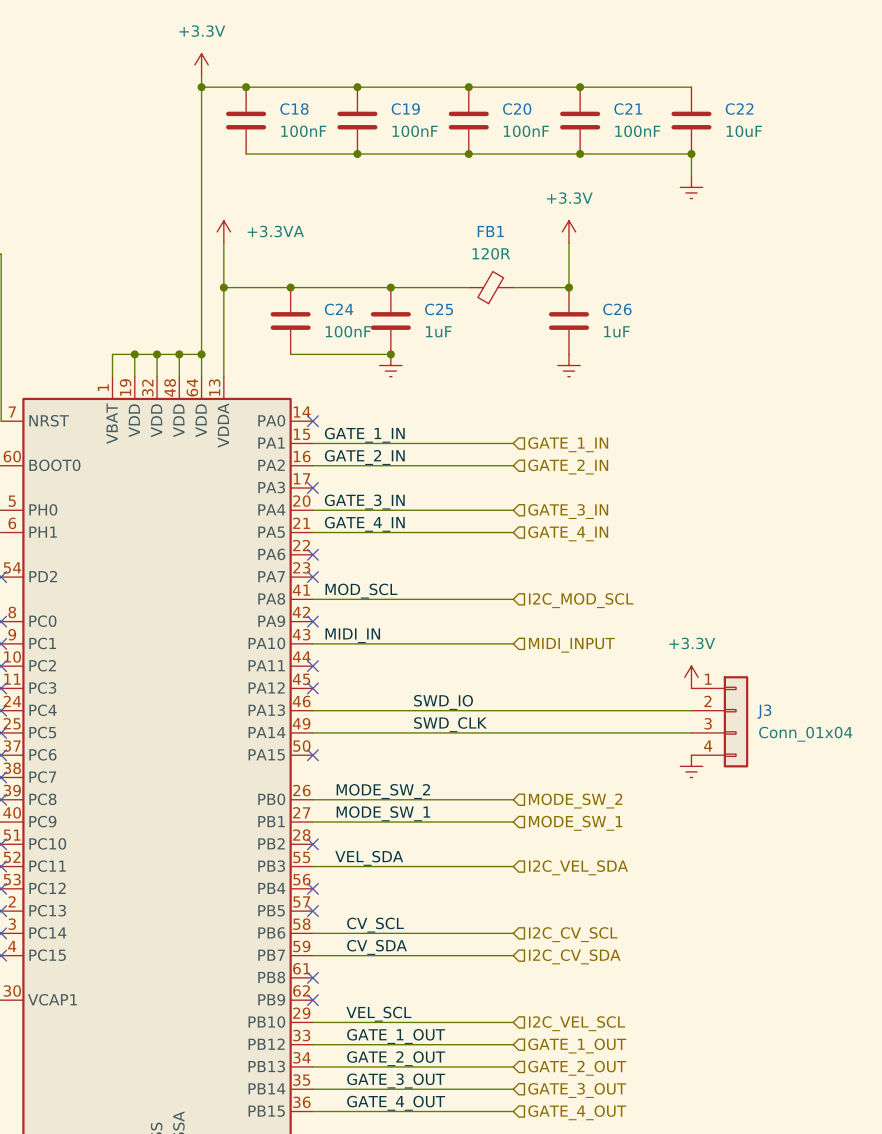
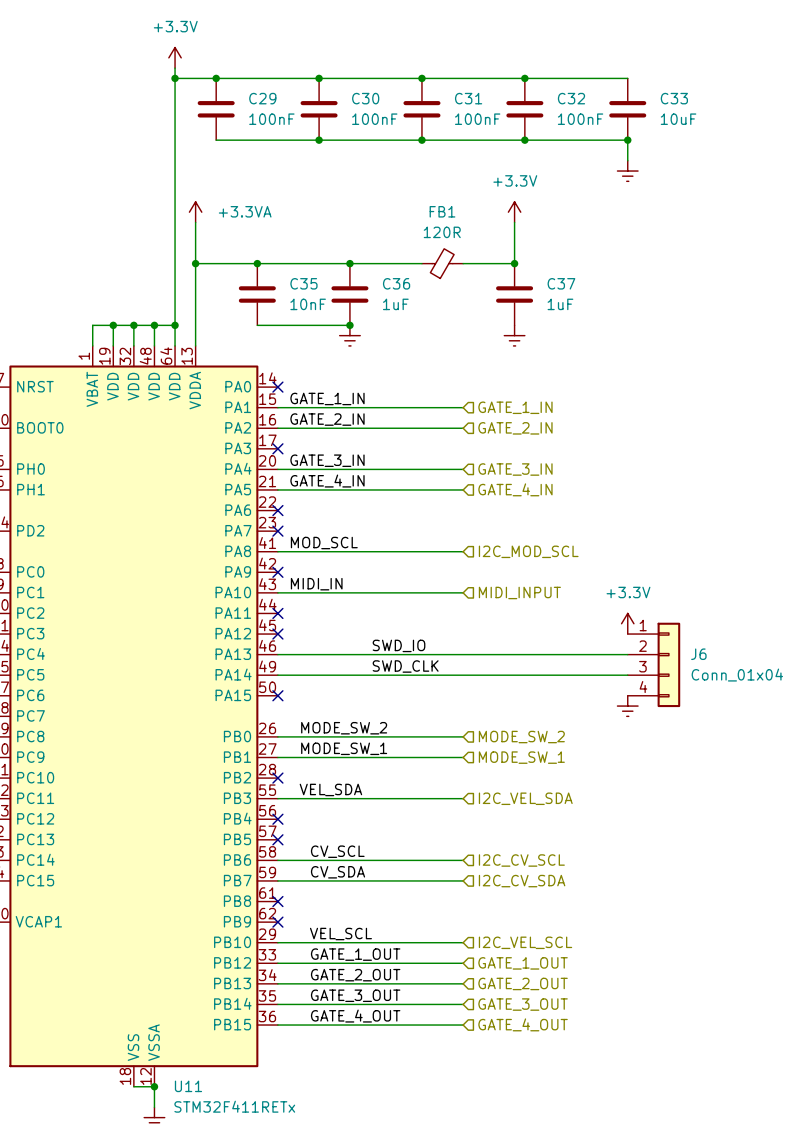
C18 name: C18 (294, 109) -> C29 (262, 98)
C19 name: C19 (405, 109) -> C30 (365, 98)
C20 name: C20 (517, 109) -> C31 (468, 98)
C21 name: C21 (628, 109) -> C32 (571, 98)
C22 name: C22 (739, 109) -> C33 (674, 98)
C24 name: C24 (339, 309) -> C35 (303, 283)
C25 name: C25 (439, 309) -> C36 (396, 283)
C26 name: C26 (617, 309) -> C37 (561, 283)
C24 value: 100nF (348, 331) -> 10nF (308, 304)
J3 name: J3 (764, 711) -> J6 (698, 654)

